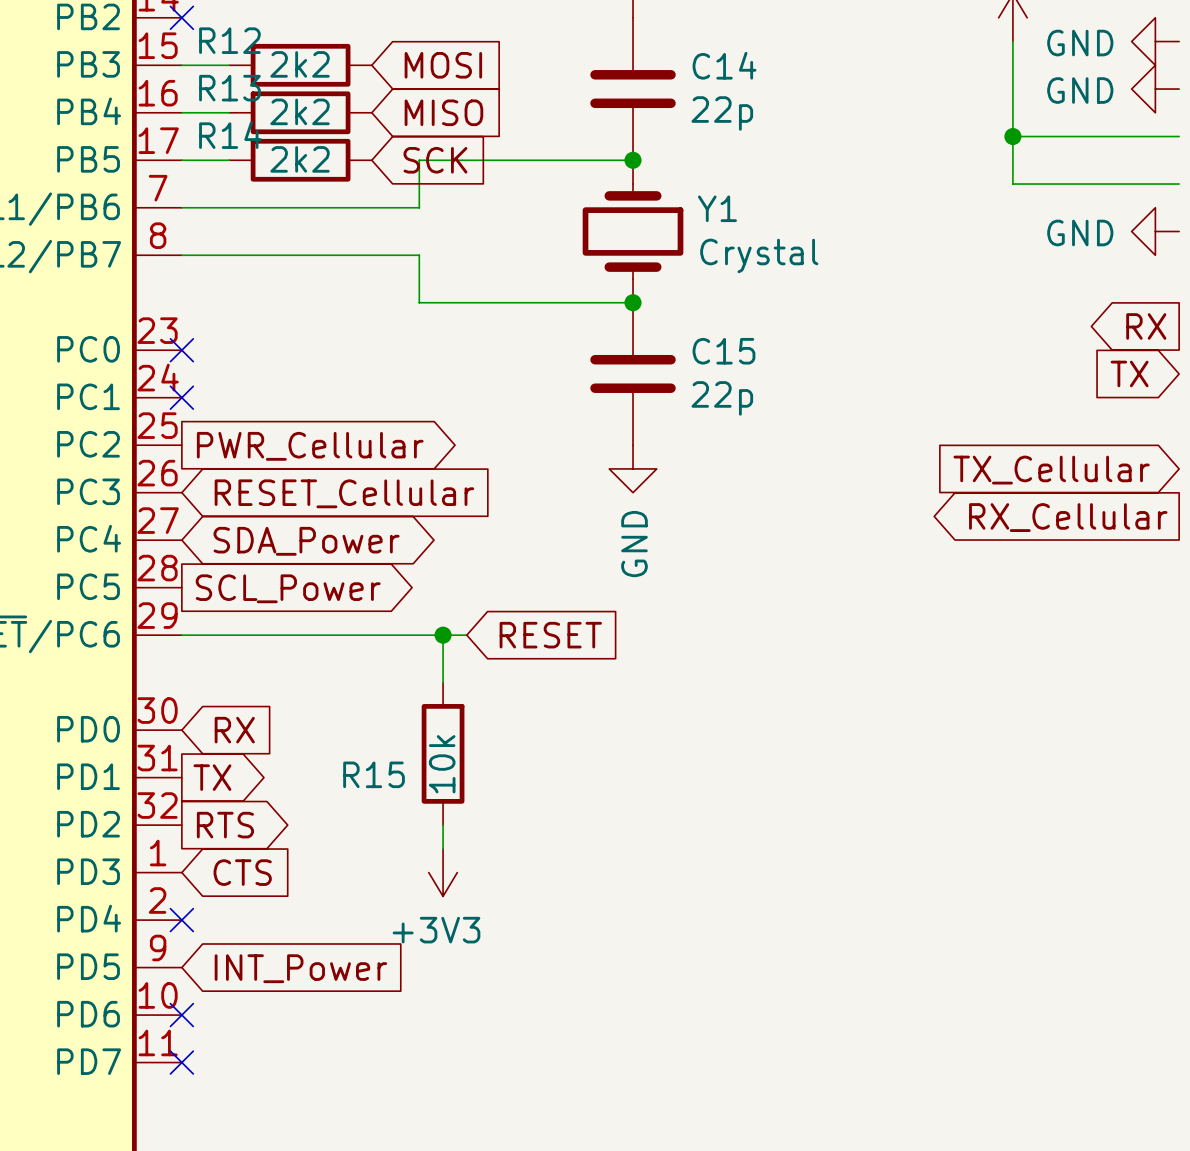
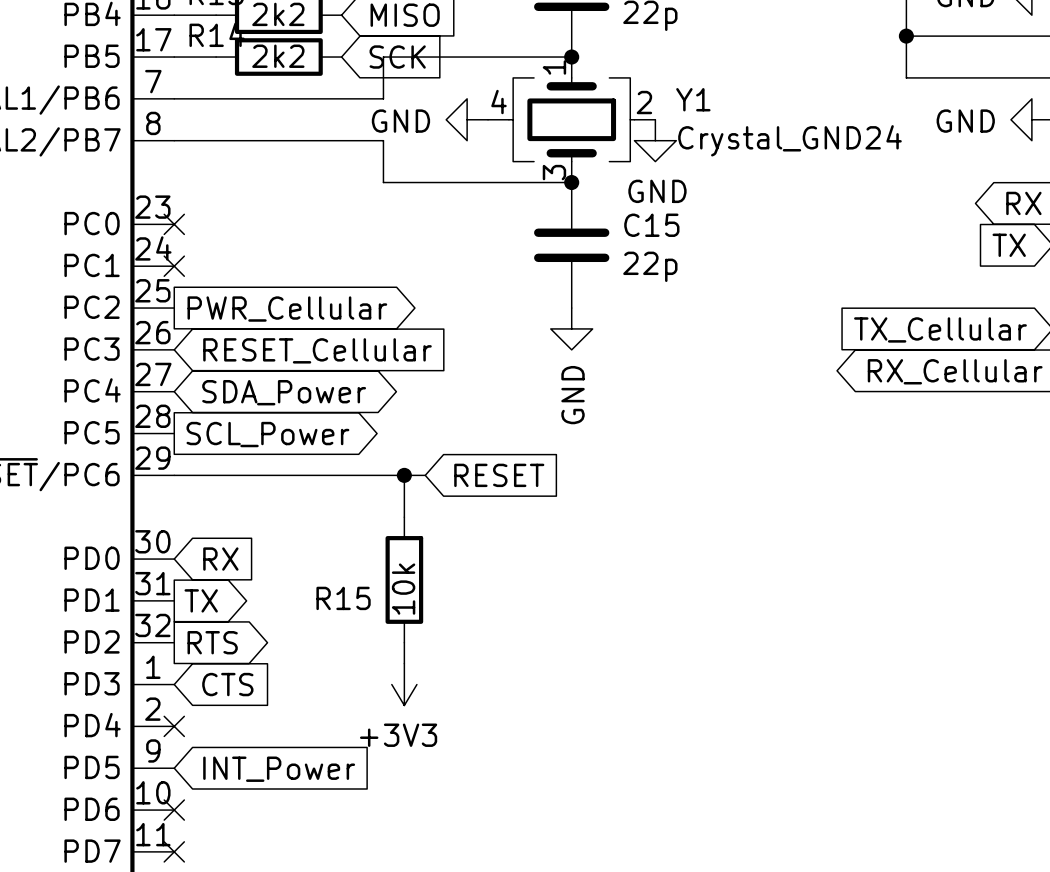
Y1 symbol: [582, 160, 684, 303] -> [488, 57, 656, 183]
Y1 name position: Y1 (717, 208) -> Y1 (693, 99)
power symbol: none -> GND (467, 119)
power symbol: none -> GND (655, 140)
Y1 value: Crystal (759, 255) -> Crystal_GND24 (789, 140)

